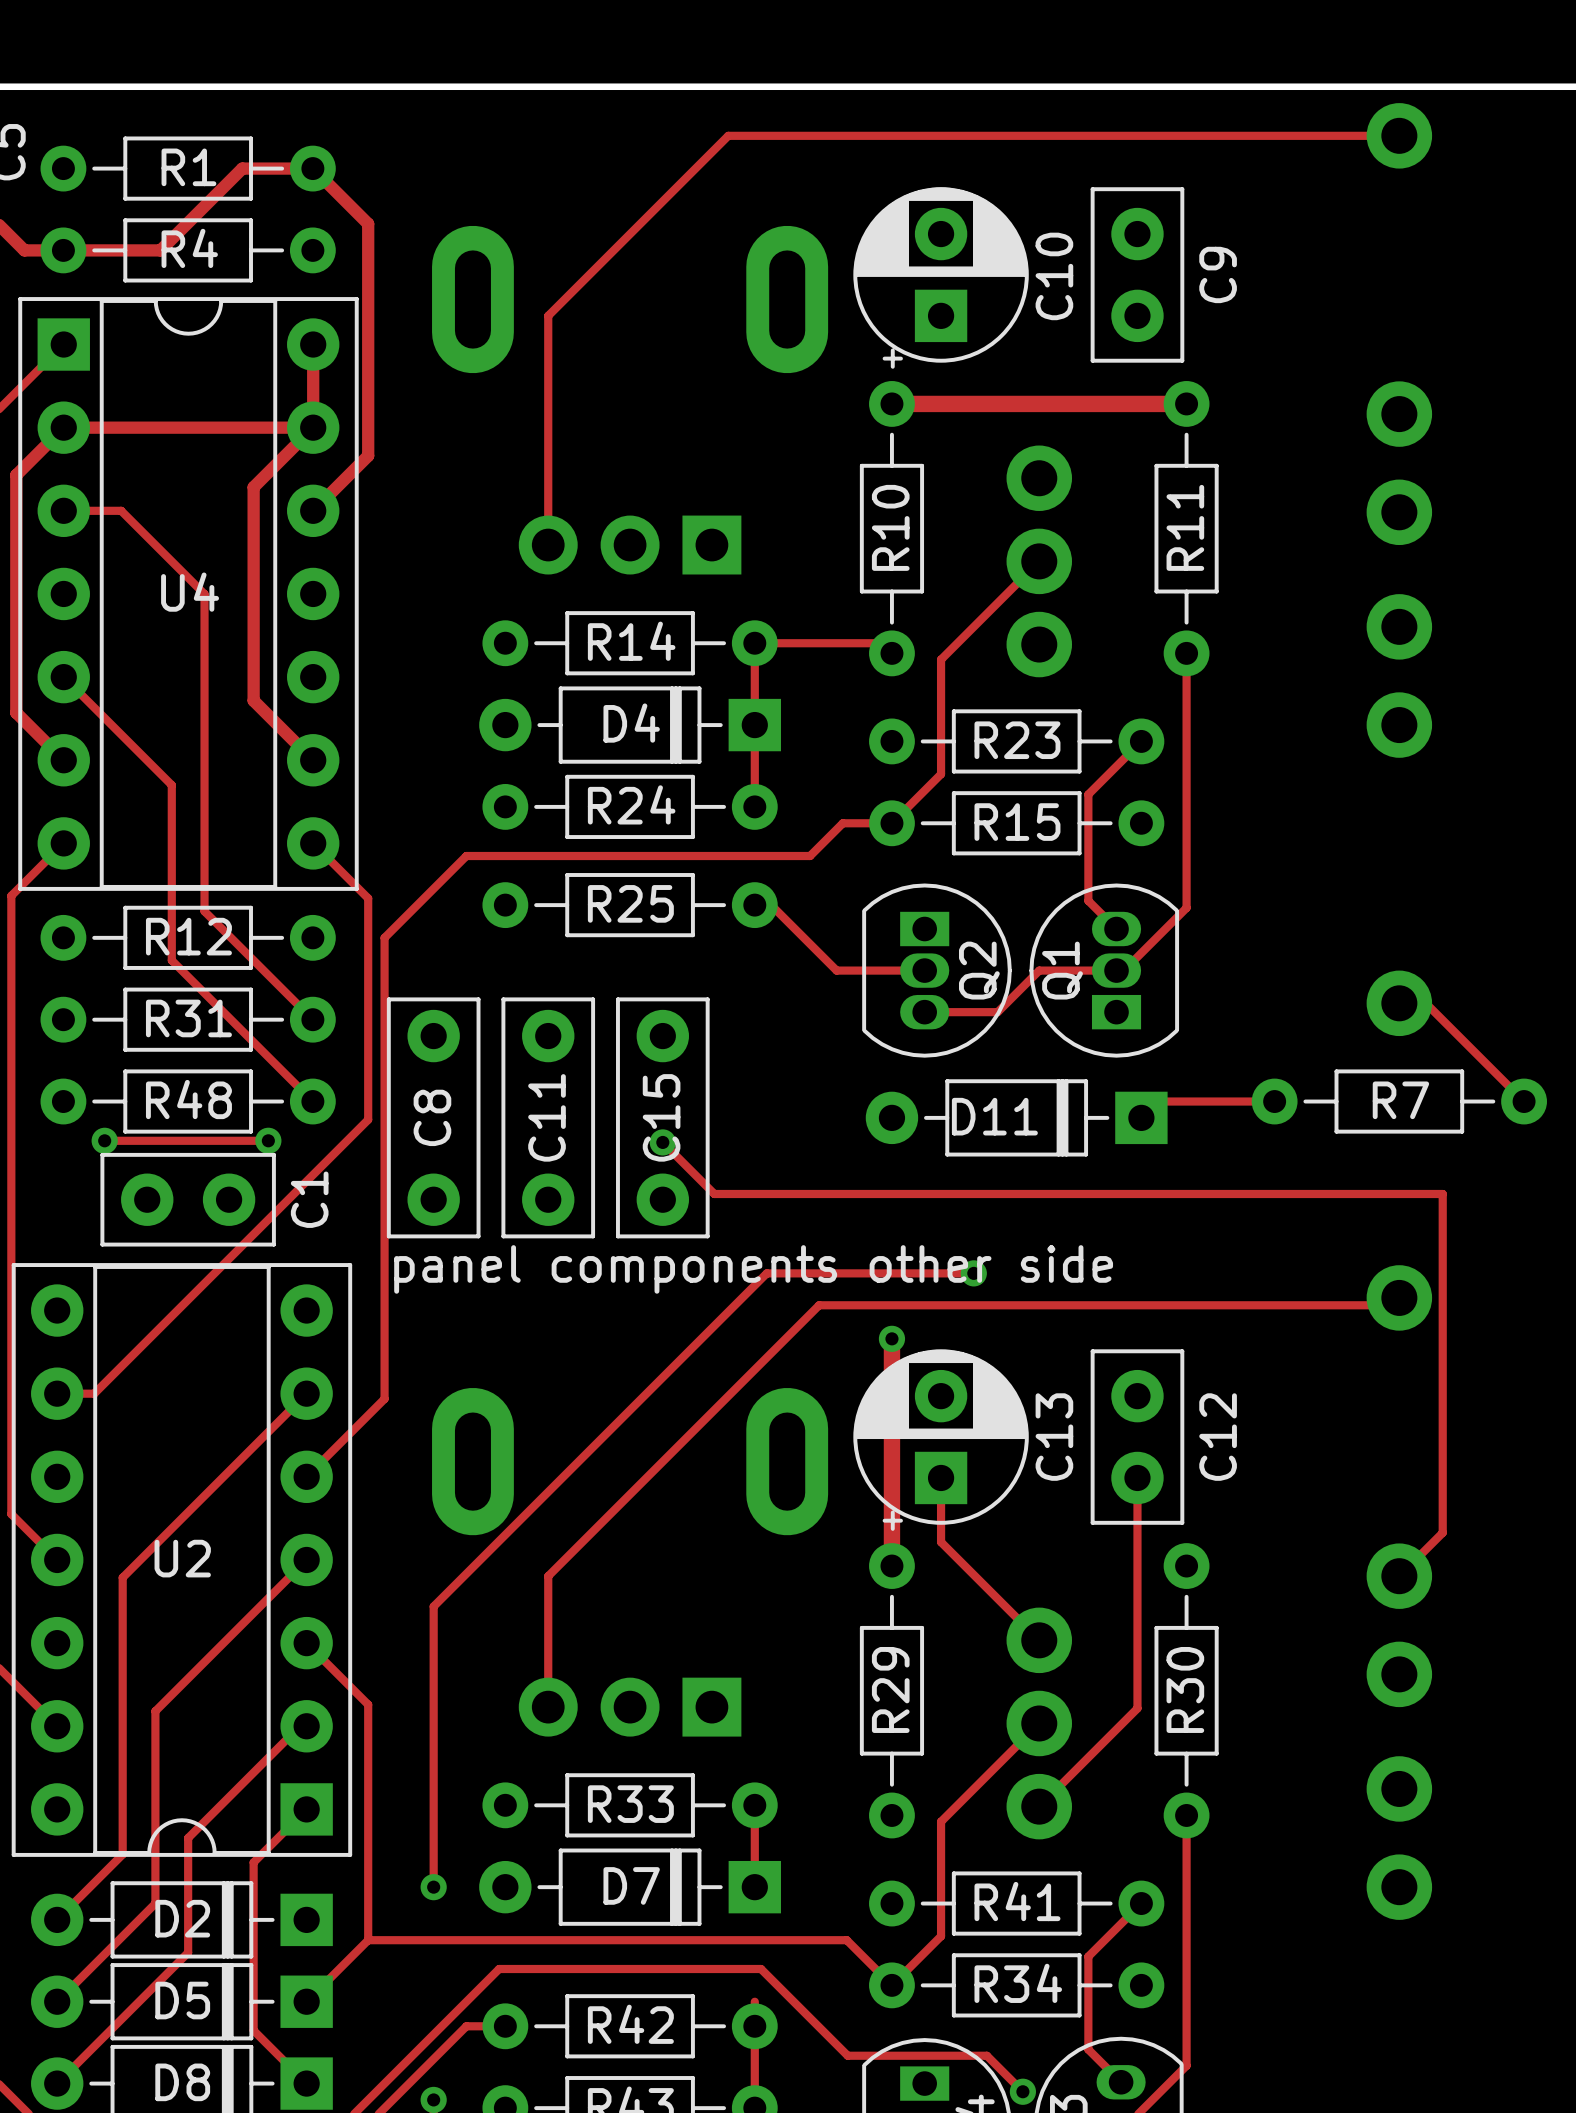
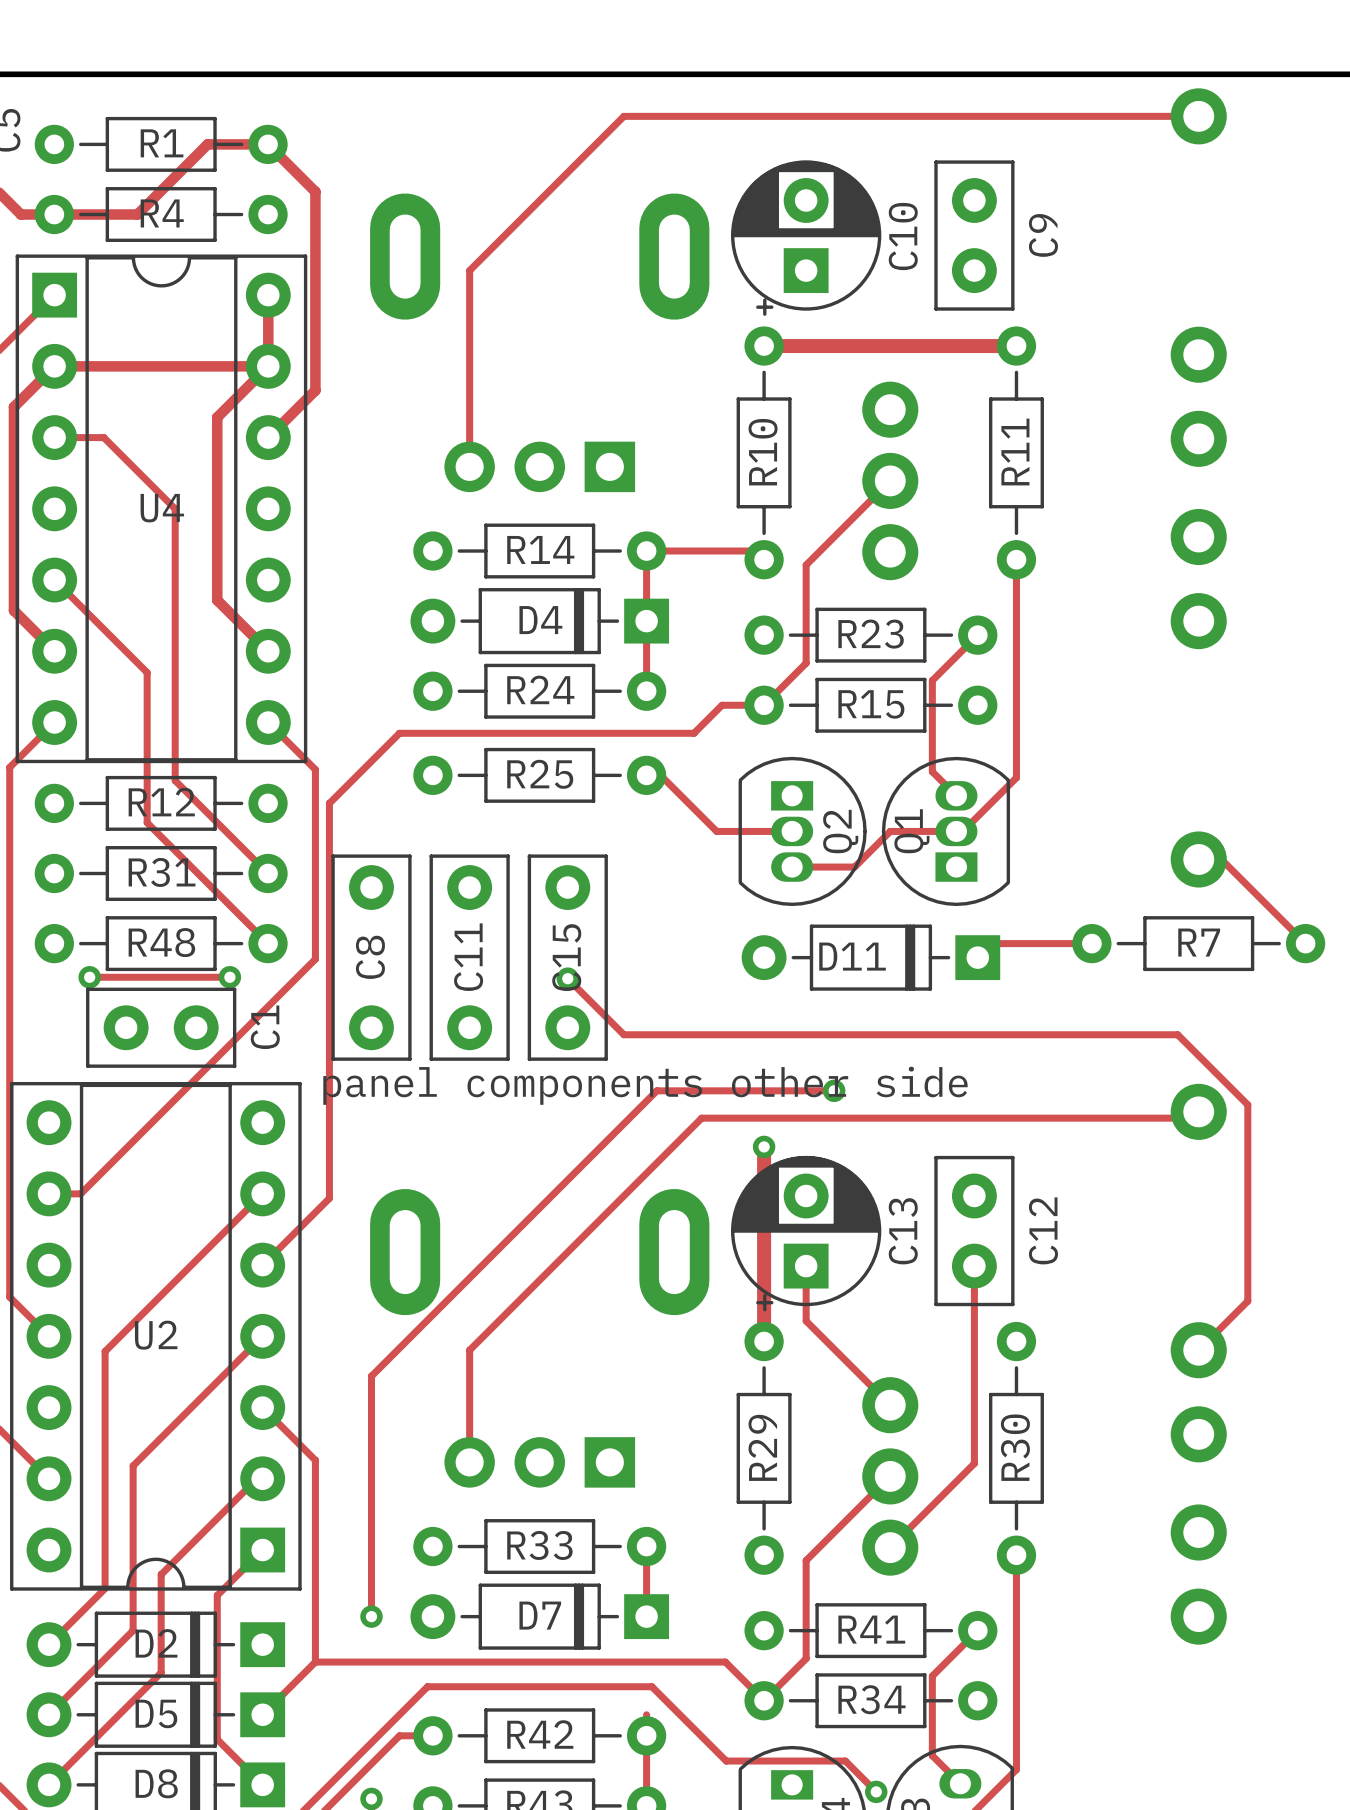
track: (714, 1194) (1442, 1194) (1442, 1532) -> (611, 1022) (623, 1034) (1177, 1034) (1247, 1104) (1247, 1301) (1235, 1313)

